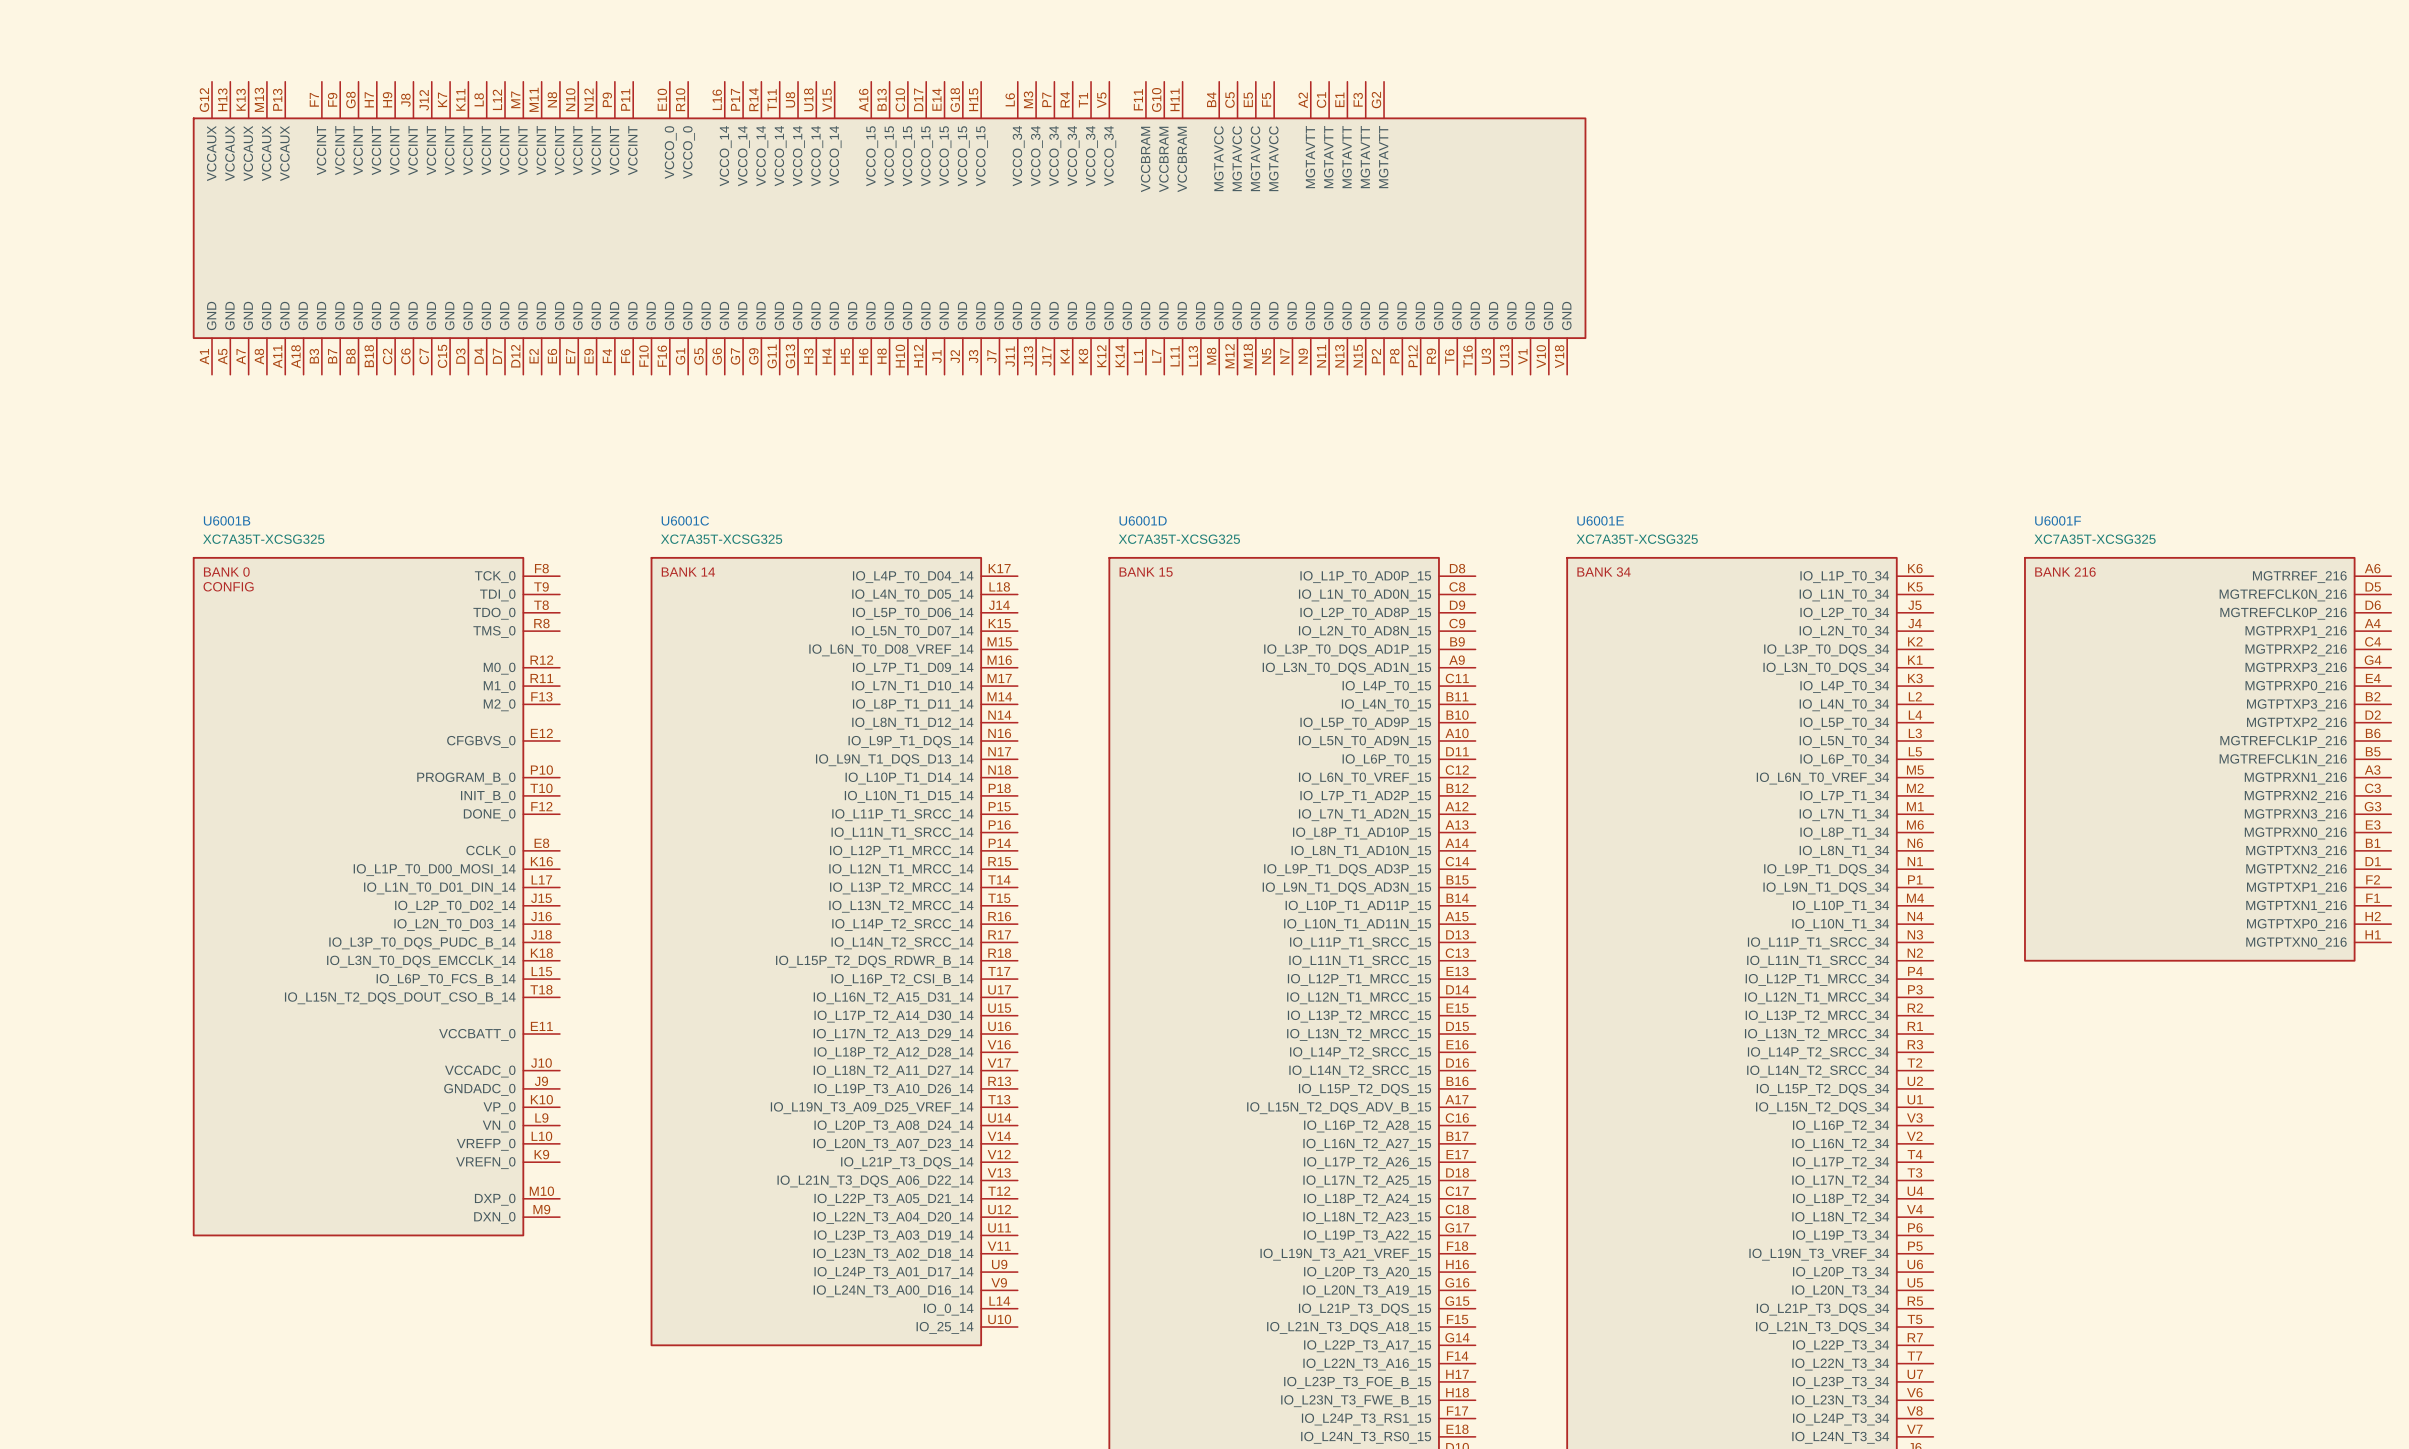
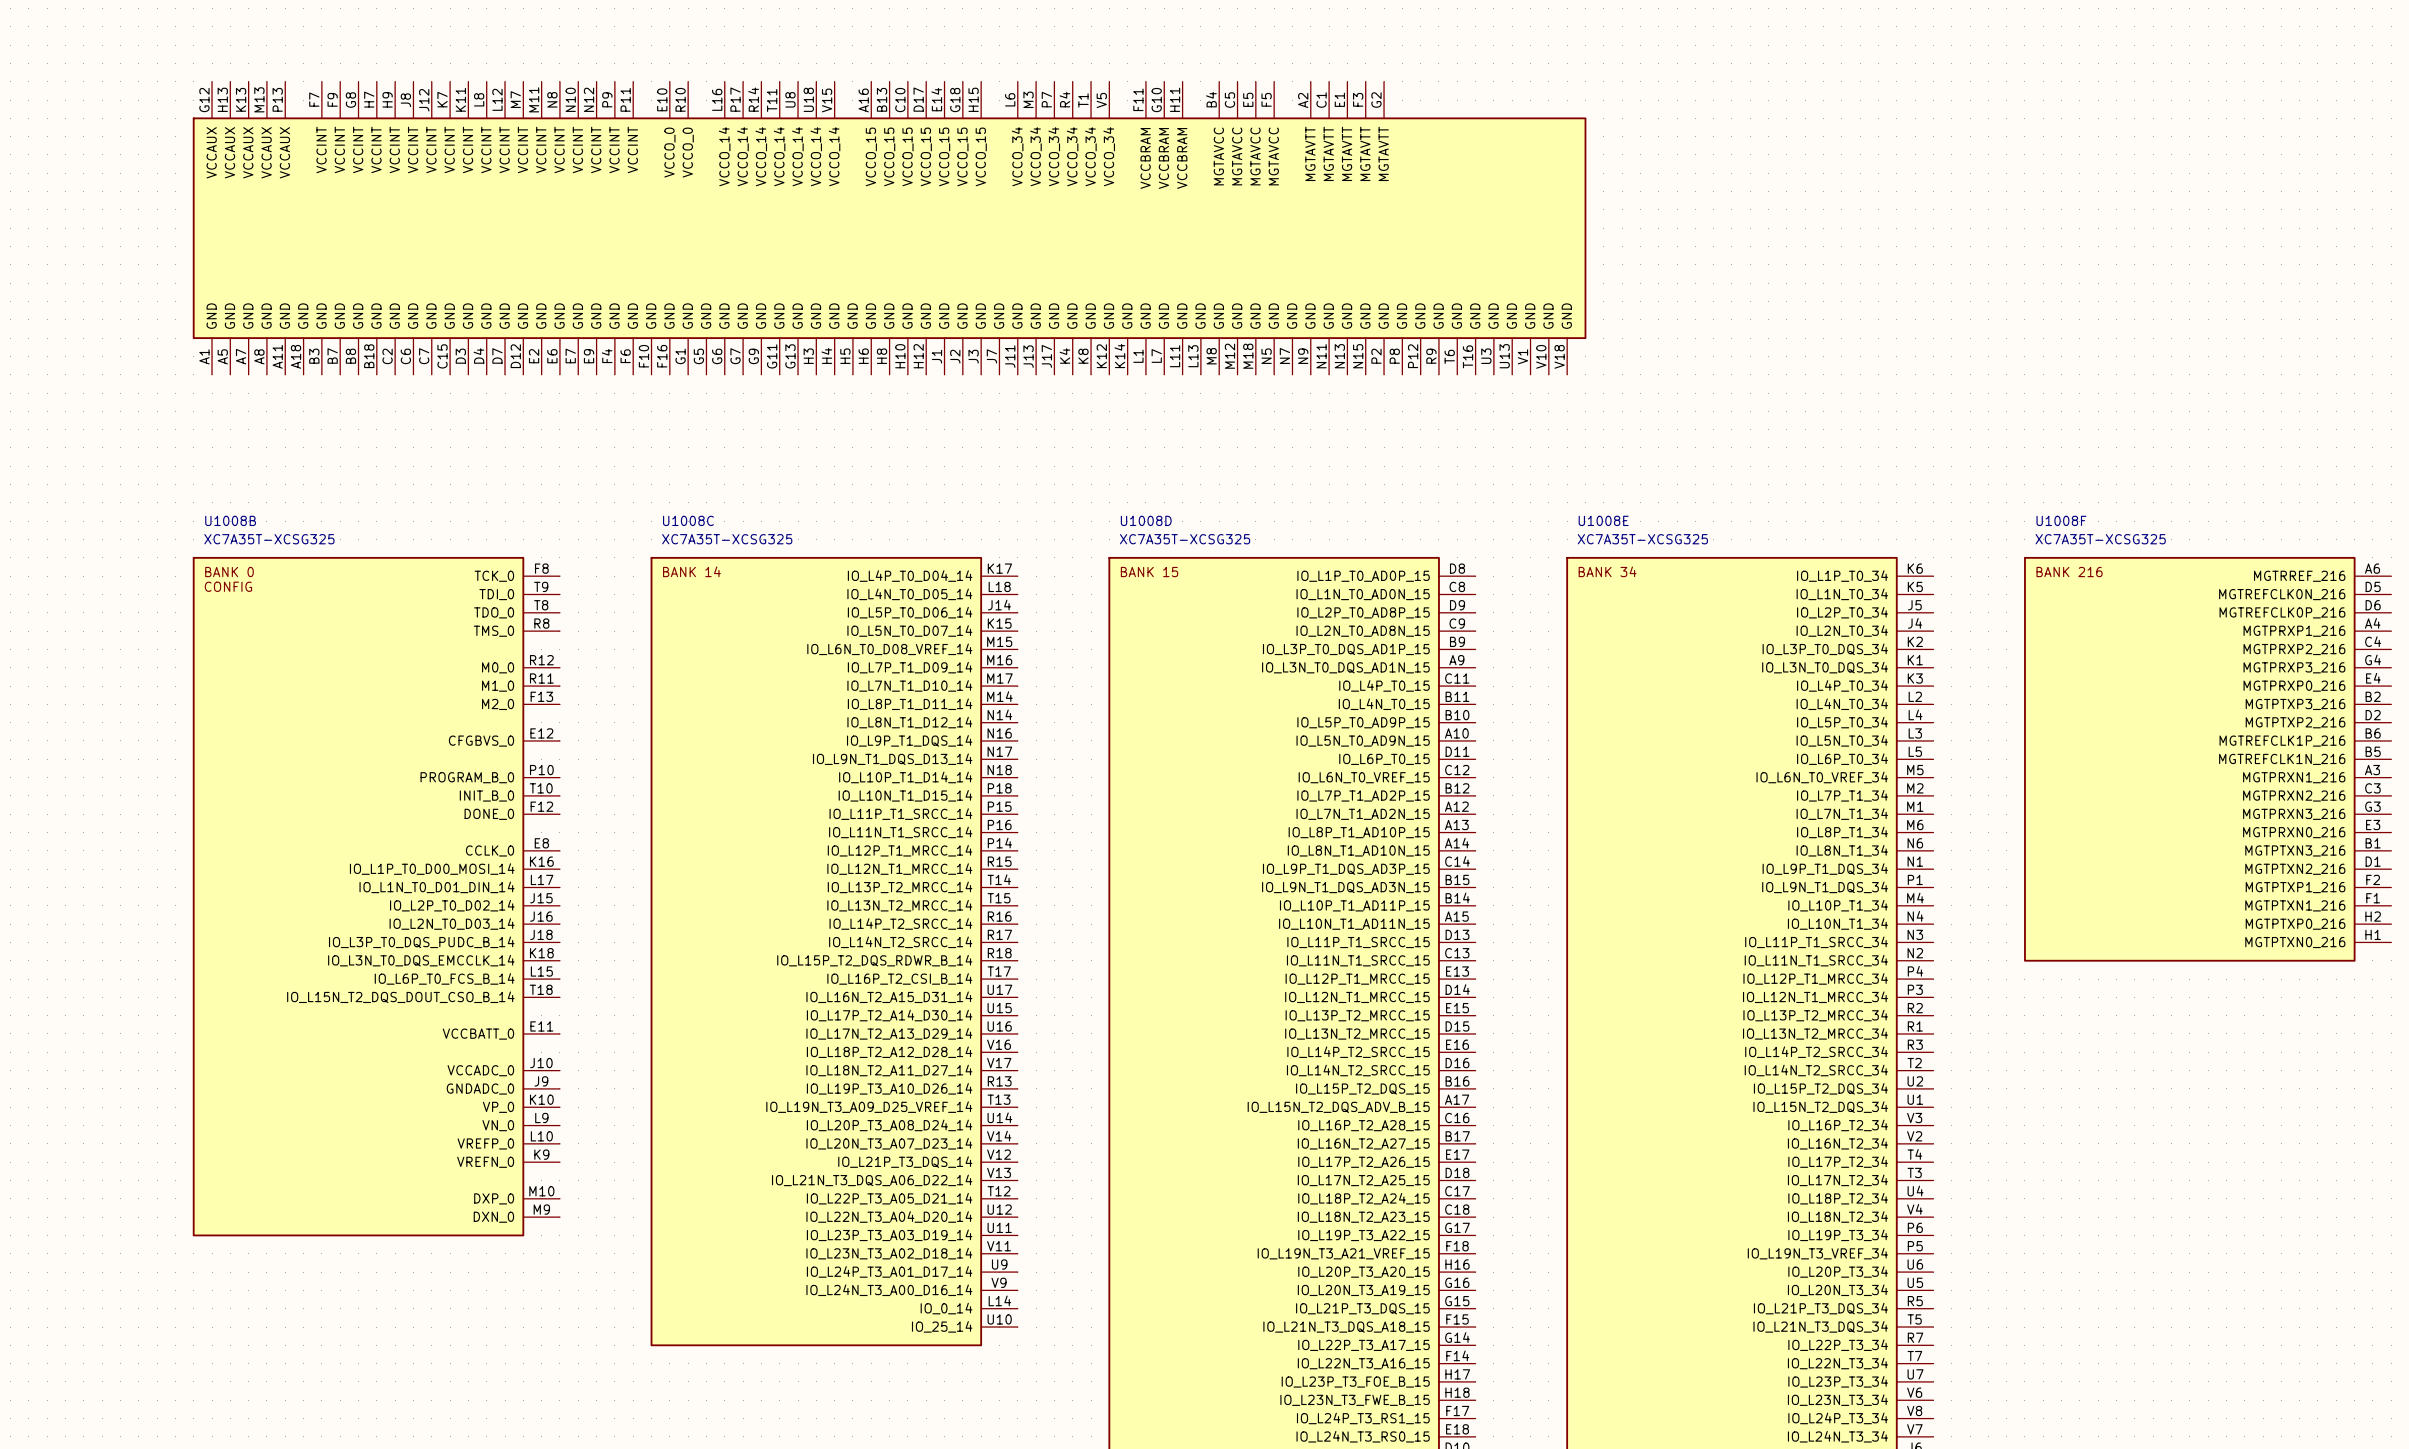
U6001B name: U6001B (227, 520) -> U1008B (230, 520)
U6001C name: U6001C (685, 520) -> U1008C (688, 520)
U6001D name: U6001D (1143, 520) -> U1008D (1146, 520)
U6001E name: U6001E (1600, 520) -> U1008E (1603, 520)
U6001F name: U6001F (2058, 520) -> U1008F (2061, 520)

